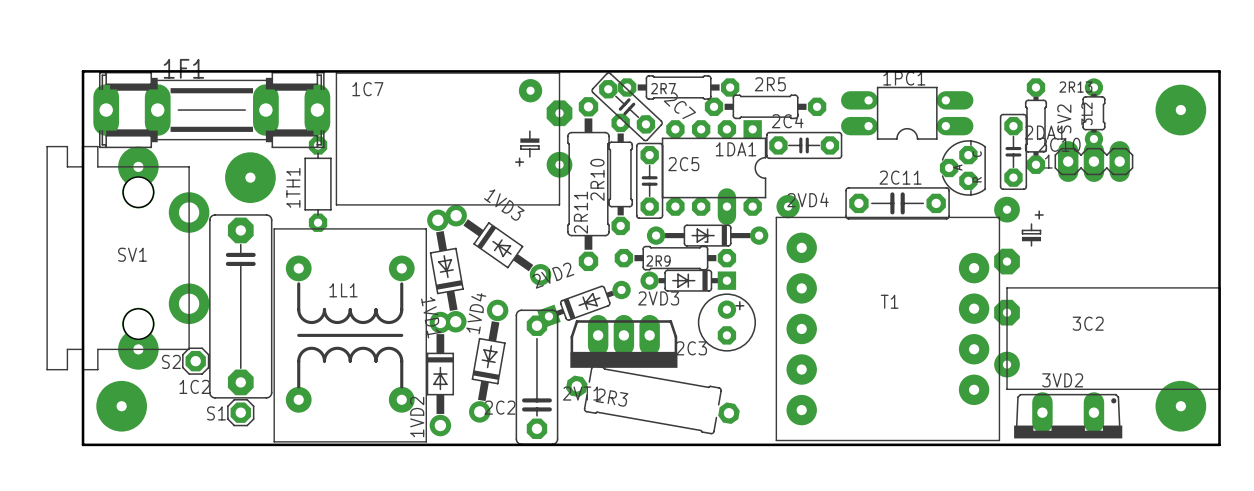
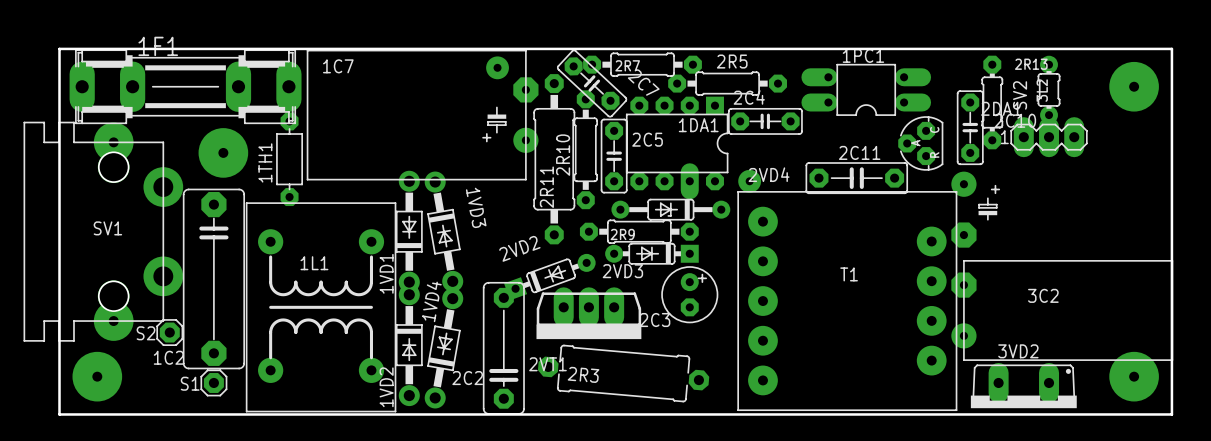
1VD3 rotation: 0° (498, 245) -> 45° clockwise (443, 231)
1VD1 rotation: 0° (446, 271) -> 10° clockwise (409, 231)
1VD4 position: (488, 361) -> (443, 348)
2R3 rotation: 0° (652, 399) -> 5° counterclockwise (623, 373)

